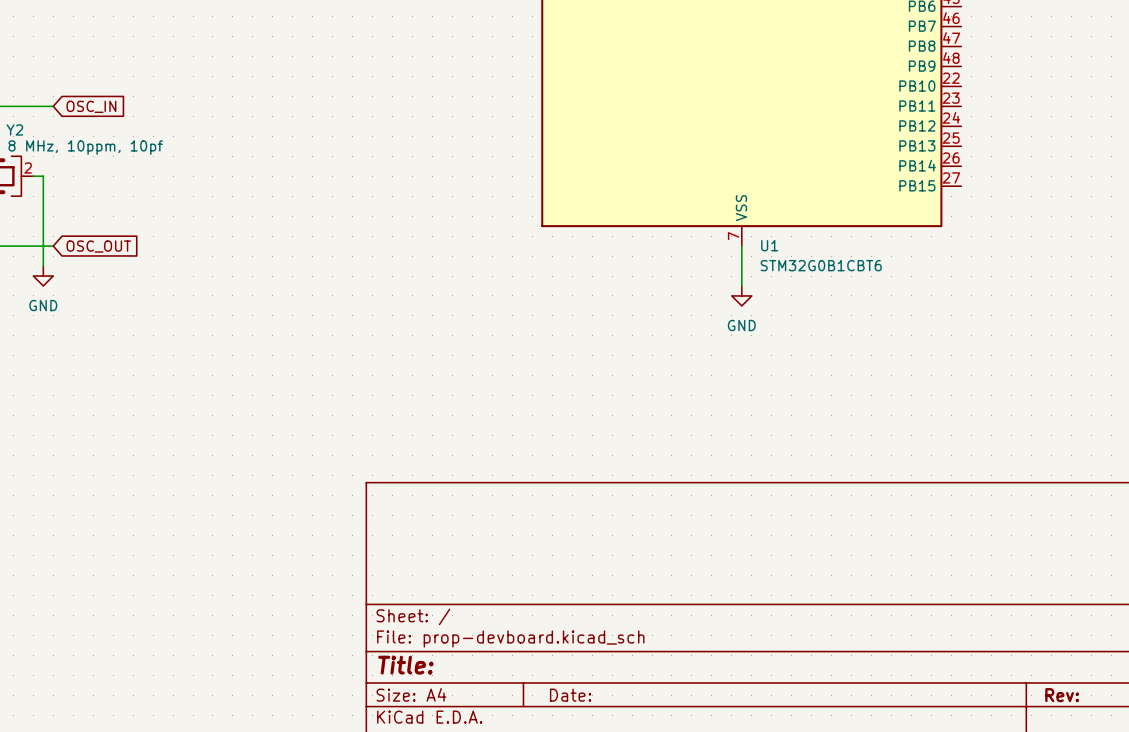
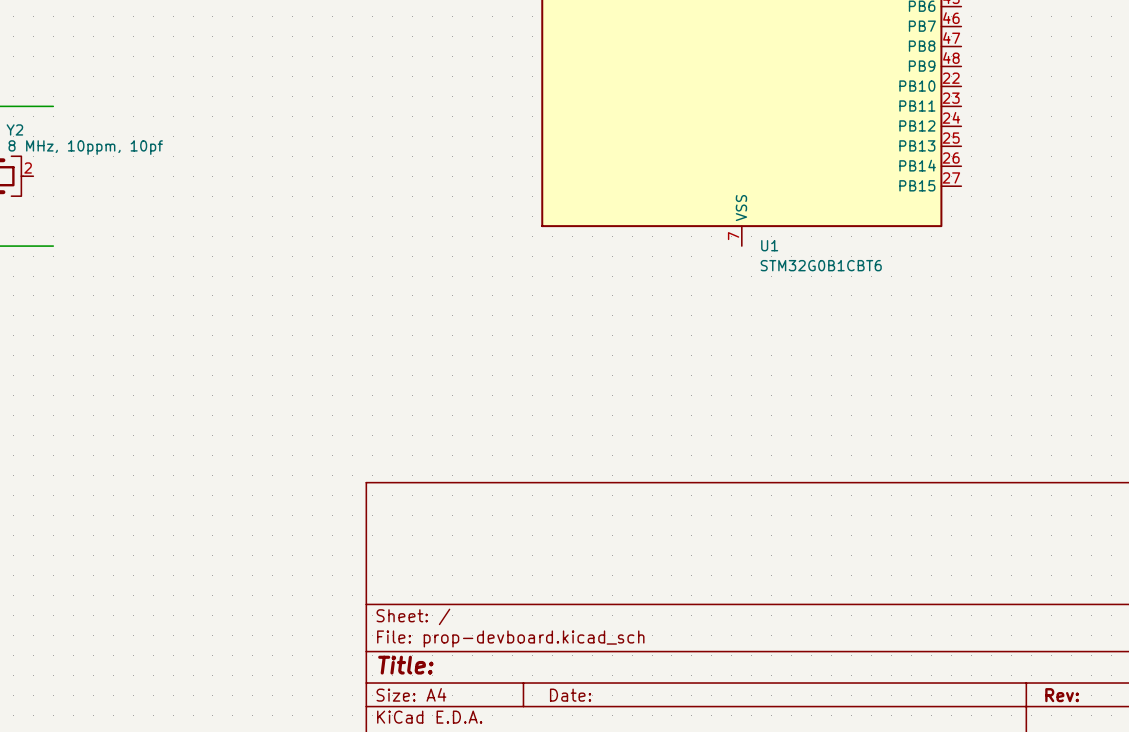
global label: OSC_IN (91, 106) -> none
wire: (33, 176) (43, 176) (43, 266) -> none
global label: OSC_OUT (98, 246) -> none
wire: (741, 246) (741, 285) -> none
power symbol: GND (43, 276) -> none
power symbol: GND (741, 295) -> none

